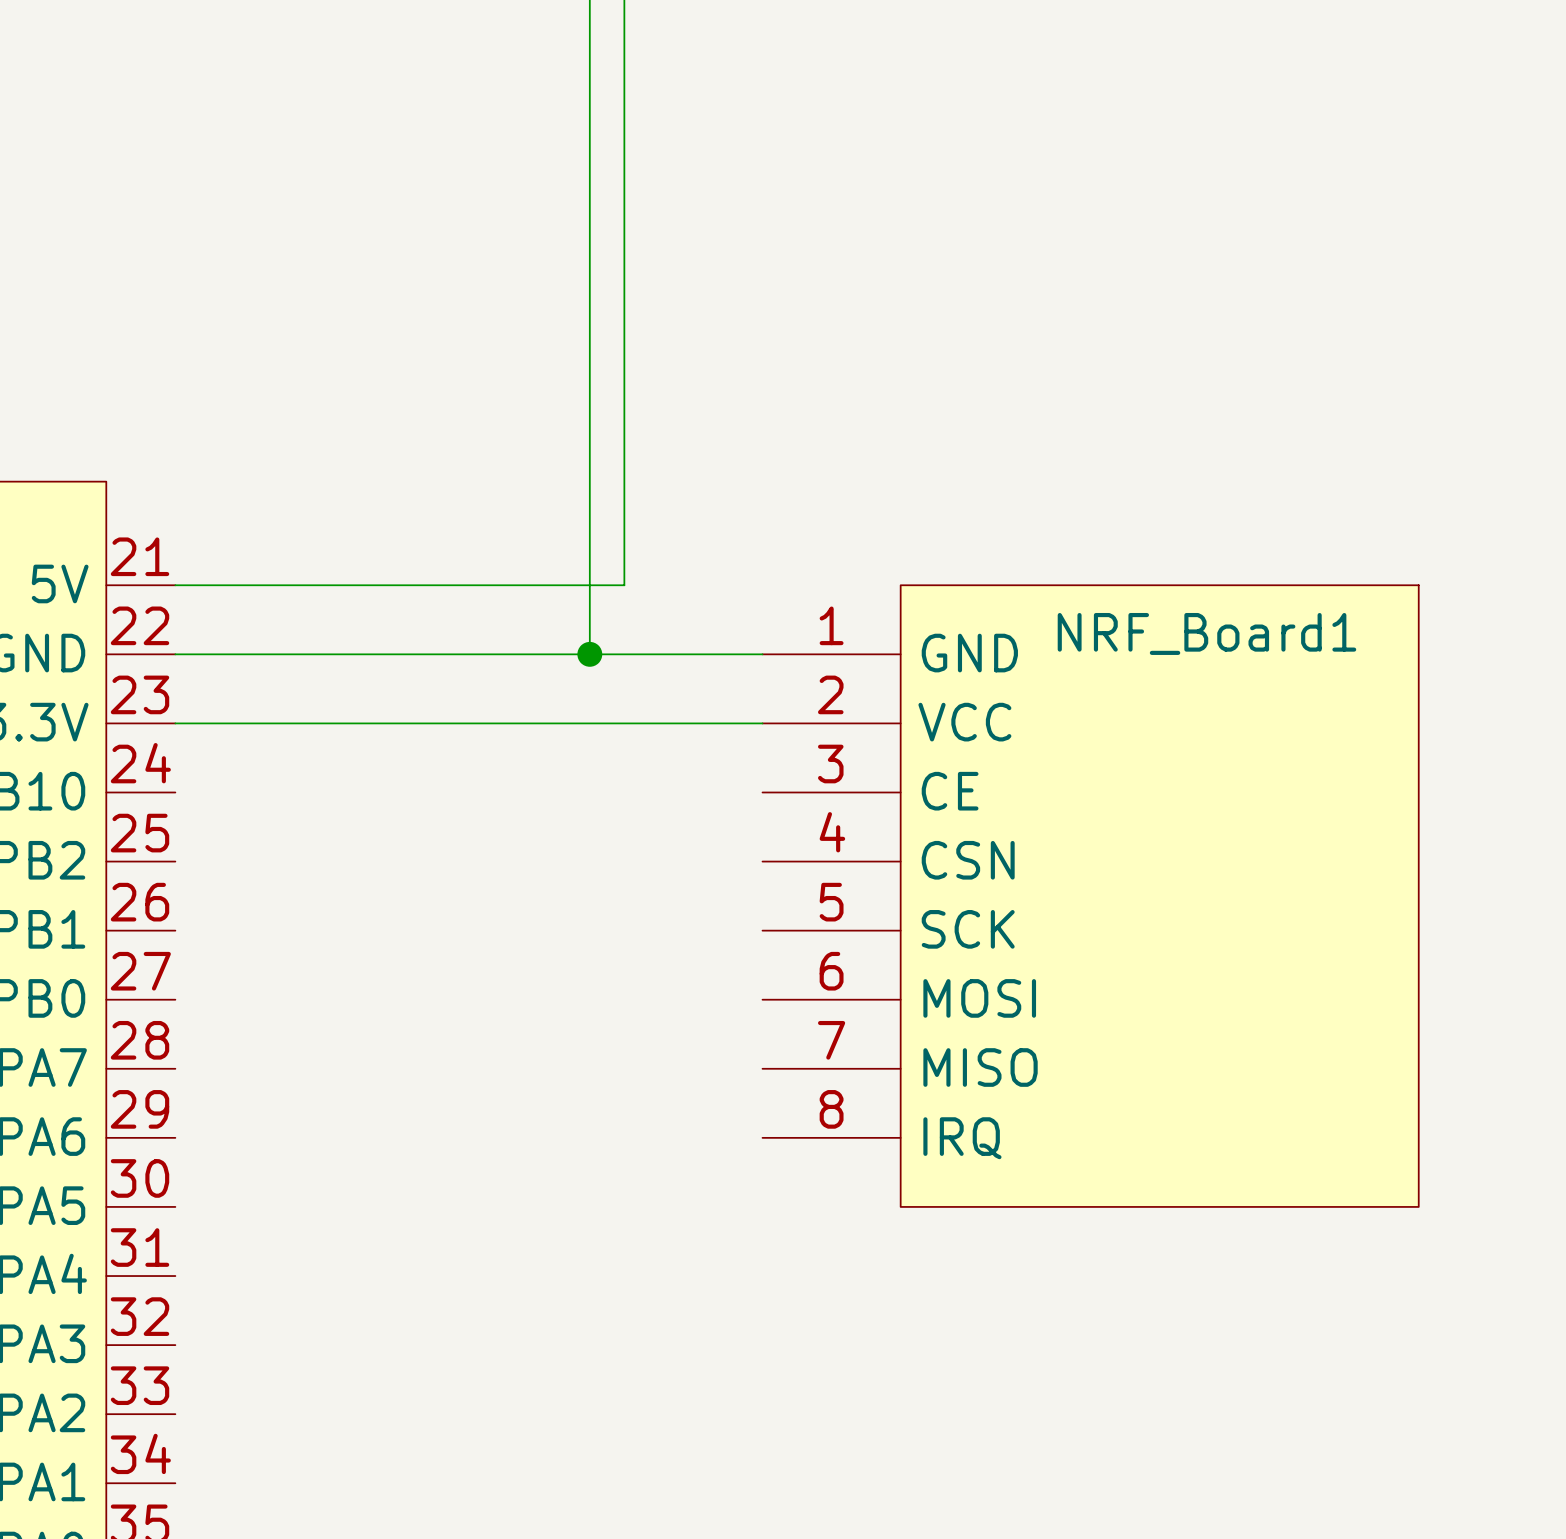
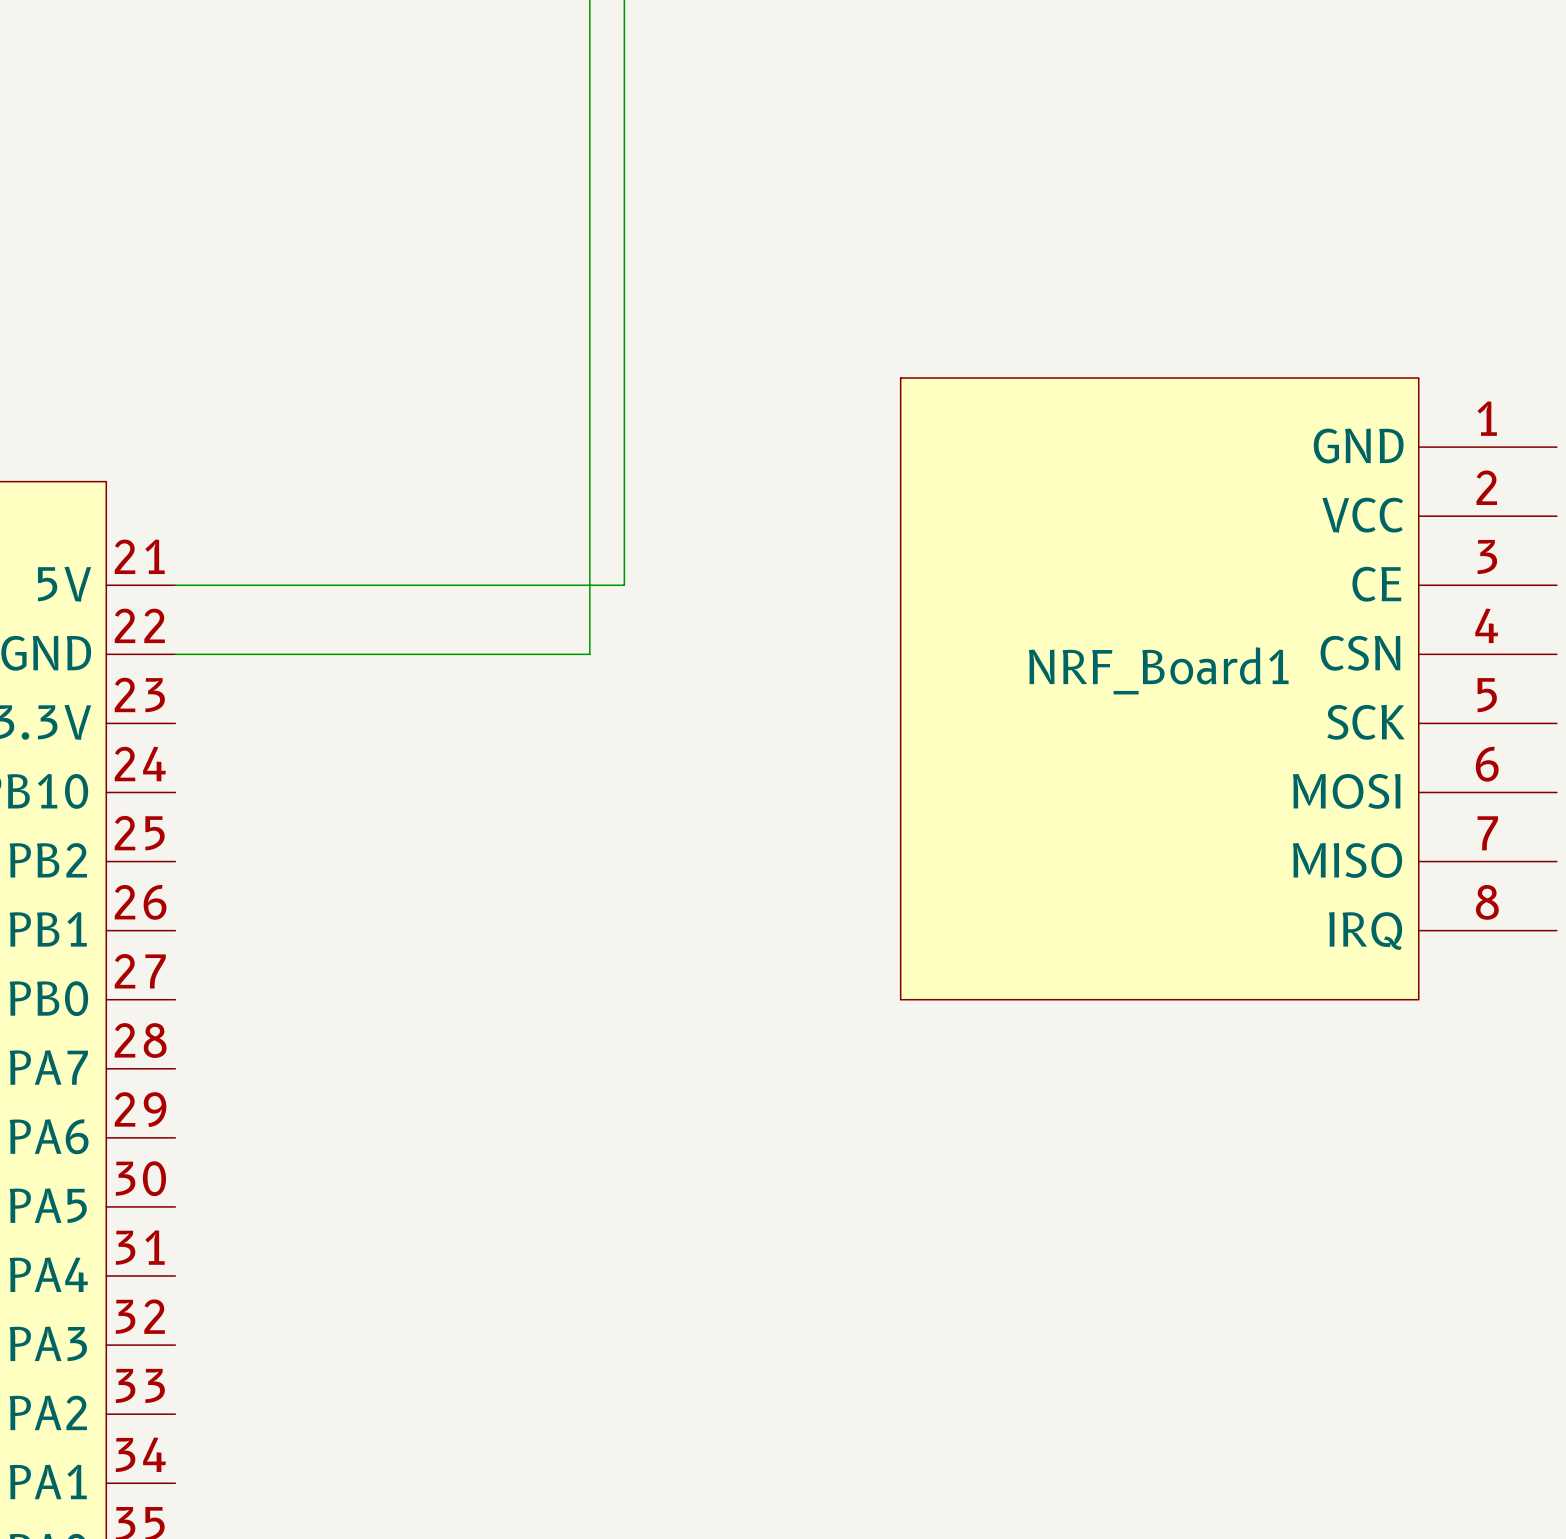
NRF_Board1 name position: NRF_Board1 (1206, 633) -> NRF_Board1 (1158, 670)
wire: (589, 654) (762, 654) -> none
junction: (589, 654) -> none
wire: (175, 723) (762, 723) -> none
NRF_Board1 flip: as is (1159, 896) -> left-right (1159, 688)

